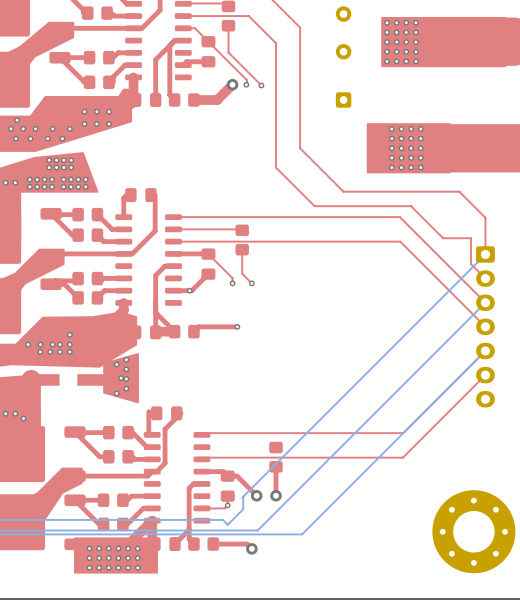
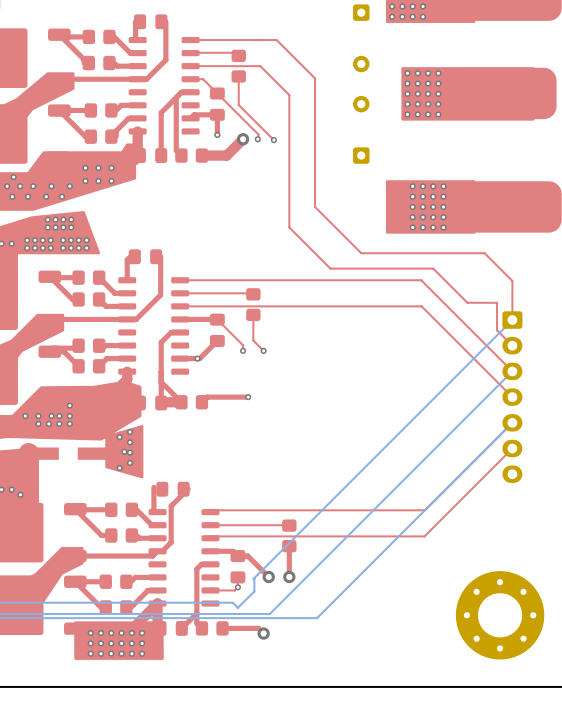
top track: none -> (217, 114) (217, 135)
via: none -> (217, 135)
top track: none -> (210, 525) (289, 525)

